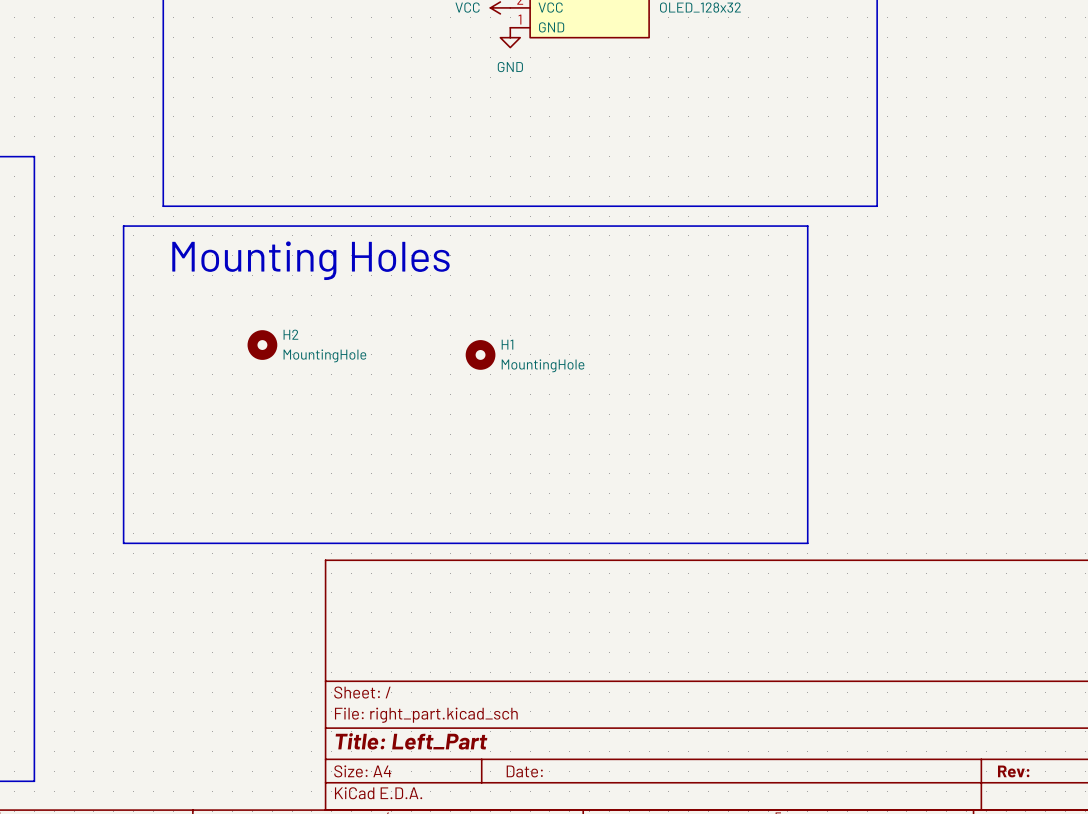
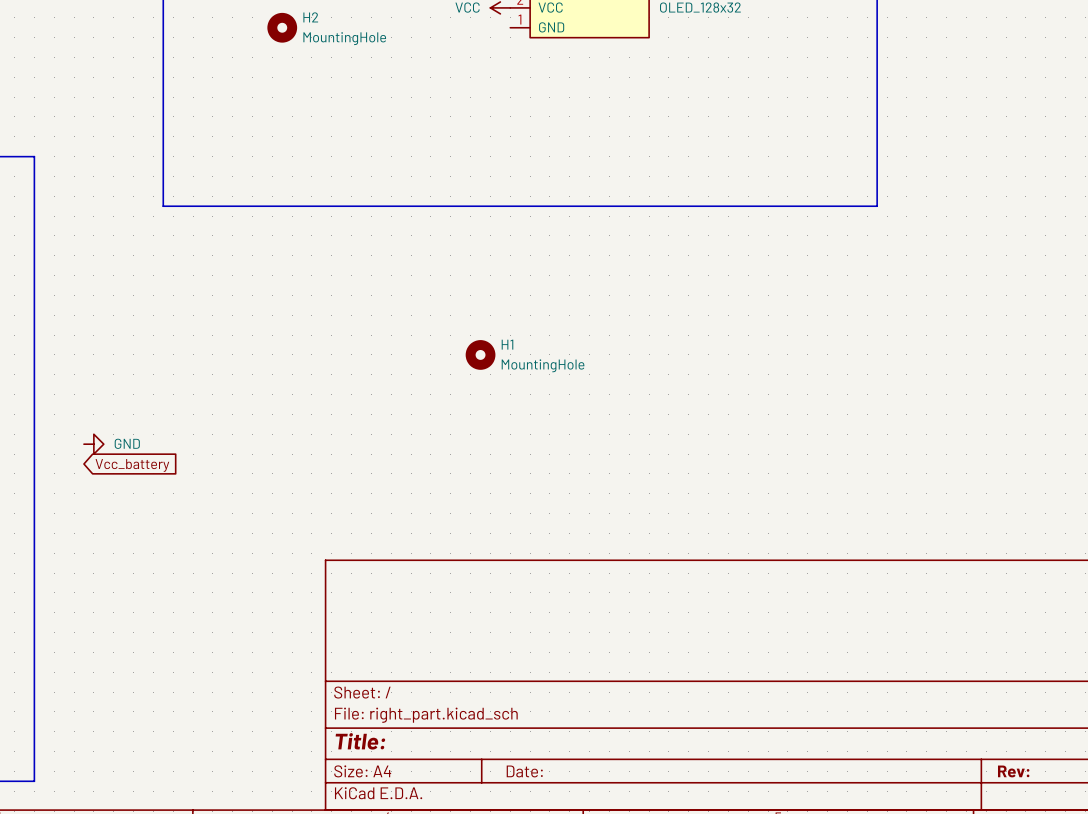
power symbol: GND (510, 37) -> none
line: (123, 226) (807, 226) (807, 543) (123, 543) (123, 226) -> none
text: Mounting Holes (310, 260) -> none
H2 position: (262, 345) -> (282, 27)
power symbol: none -> GND (93, 444)
global label: none -> Vcc_battery (132, 465)
title block: Title: Left_Part (411, 741) -> Title: (360, 741)

